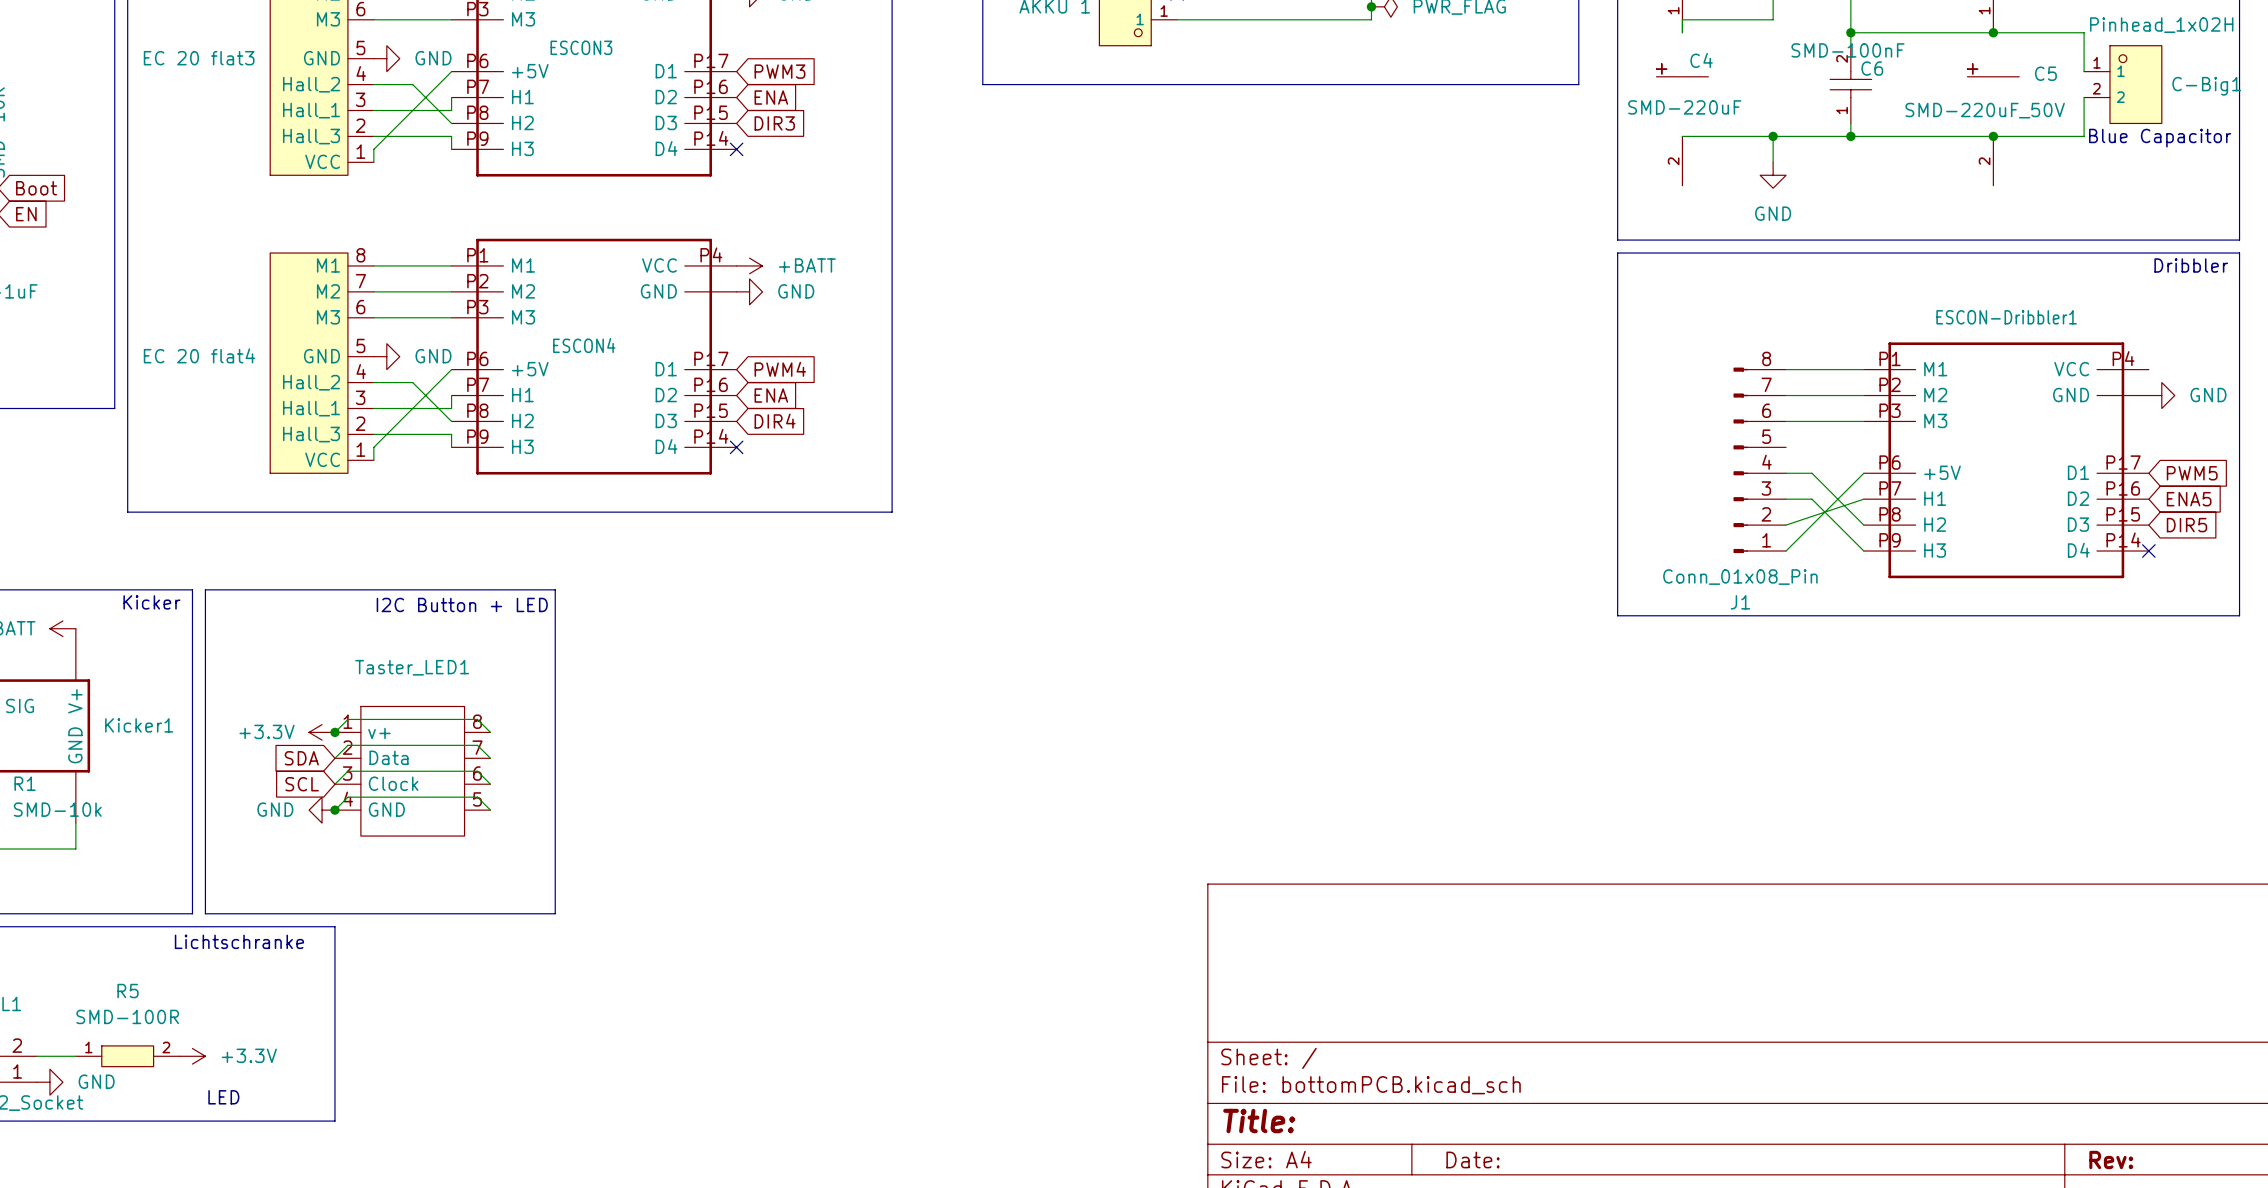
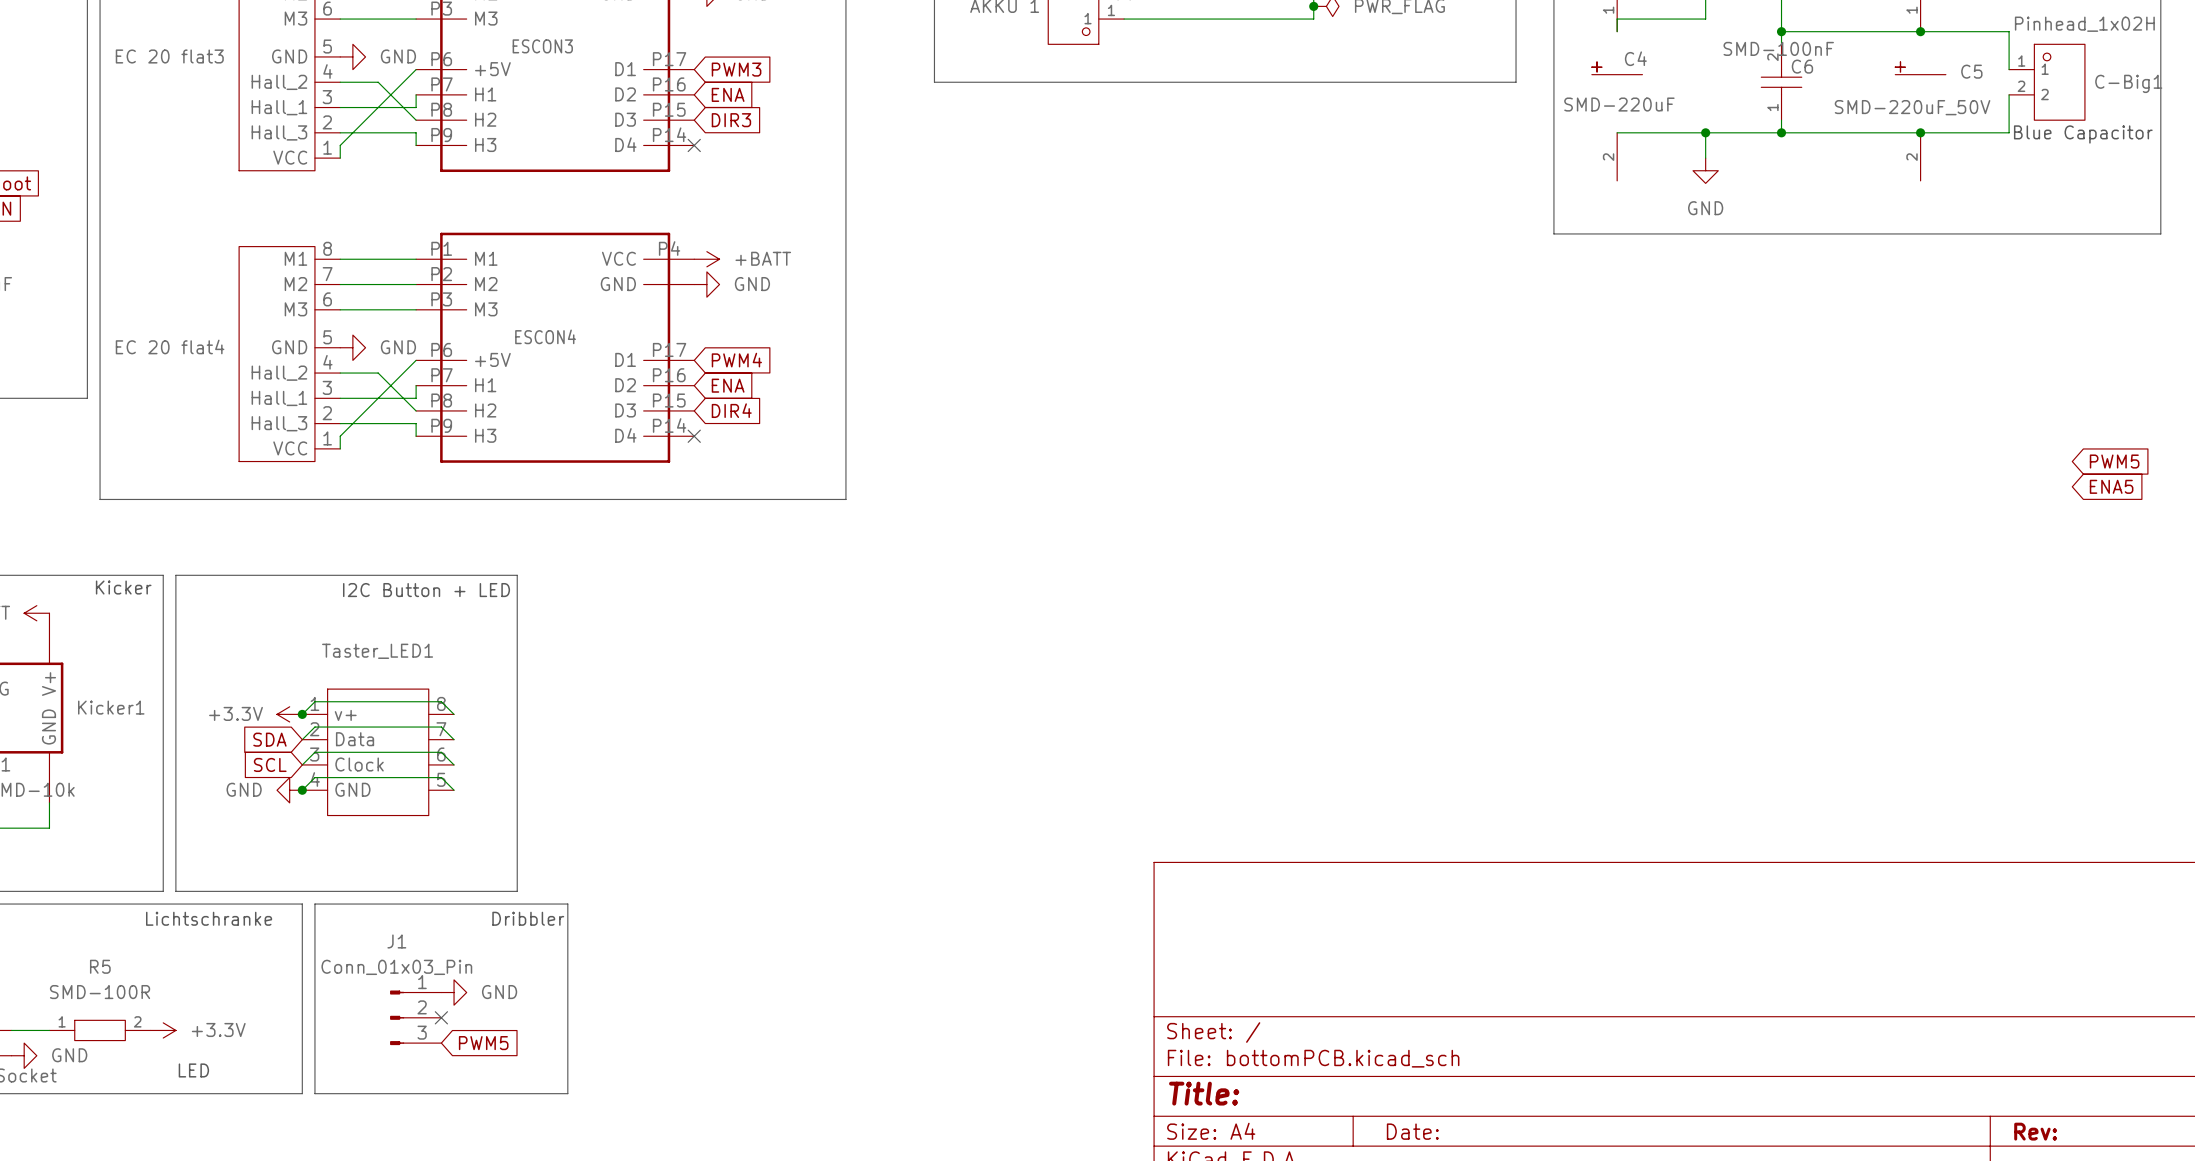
line: (1617, 253) (2239, 253) (2239, 615) (1617, 615) (1617, 253) -> none
text: Dribbler (2191, 265) -> none
J1 symbol: [1733, 367, 1787, 554] -> [390, 990, 442, 1046]
wire: (1786, 369) (1863, 369) -> none
wire: (1786, 395) (1863, 395) -> none
power symbol: GND (2161, 395) -> none
wire: (1786, 421) (1863, 421) -> none
ESCON-Dribbler1: (2006, 460) -> none
wire: (1786, 473) (1811, 473) (1863, 525) -> none
wire: (1863, 473) (1786, 551) -> none
wire: (1786, 499) (1811, 499) (1863, 551) -> none
wire: (1863, 499) (1786, 525) -> none
global label: DIR5 (2186, 525) -> none
no-connect mark: (2148, 551) -> none
J1 value: Conn_01x08_Pin (1740, 577) -> Conn_01x03_Pin (396, 967)
J1 name position: J1 (1740, 602) -> J1 (396, 941)
line: none -> (314, 904) (567, 904) (567, 1093) (314, 1093) (314, 904)
text: none -> Dribbler (528, 918)
power symbol: none -> GND (454, 992)
no-connect mark: none -> (441, 1017)
global label: none -> PWM5 (483, 1043)

